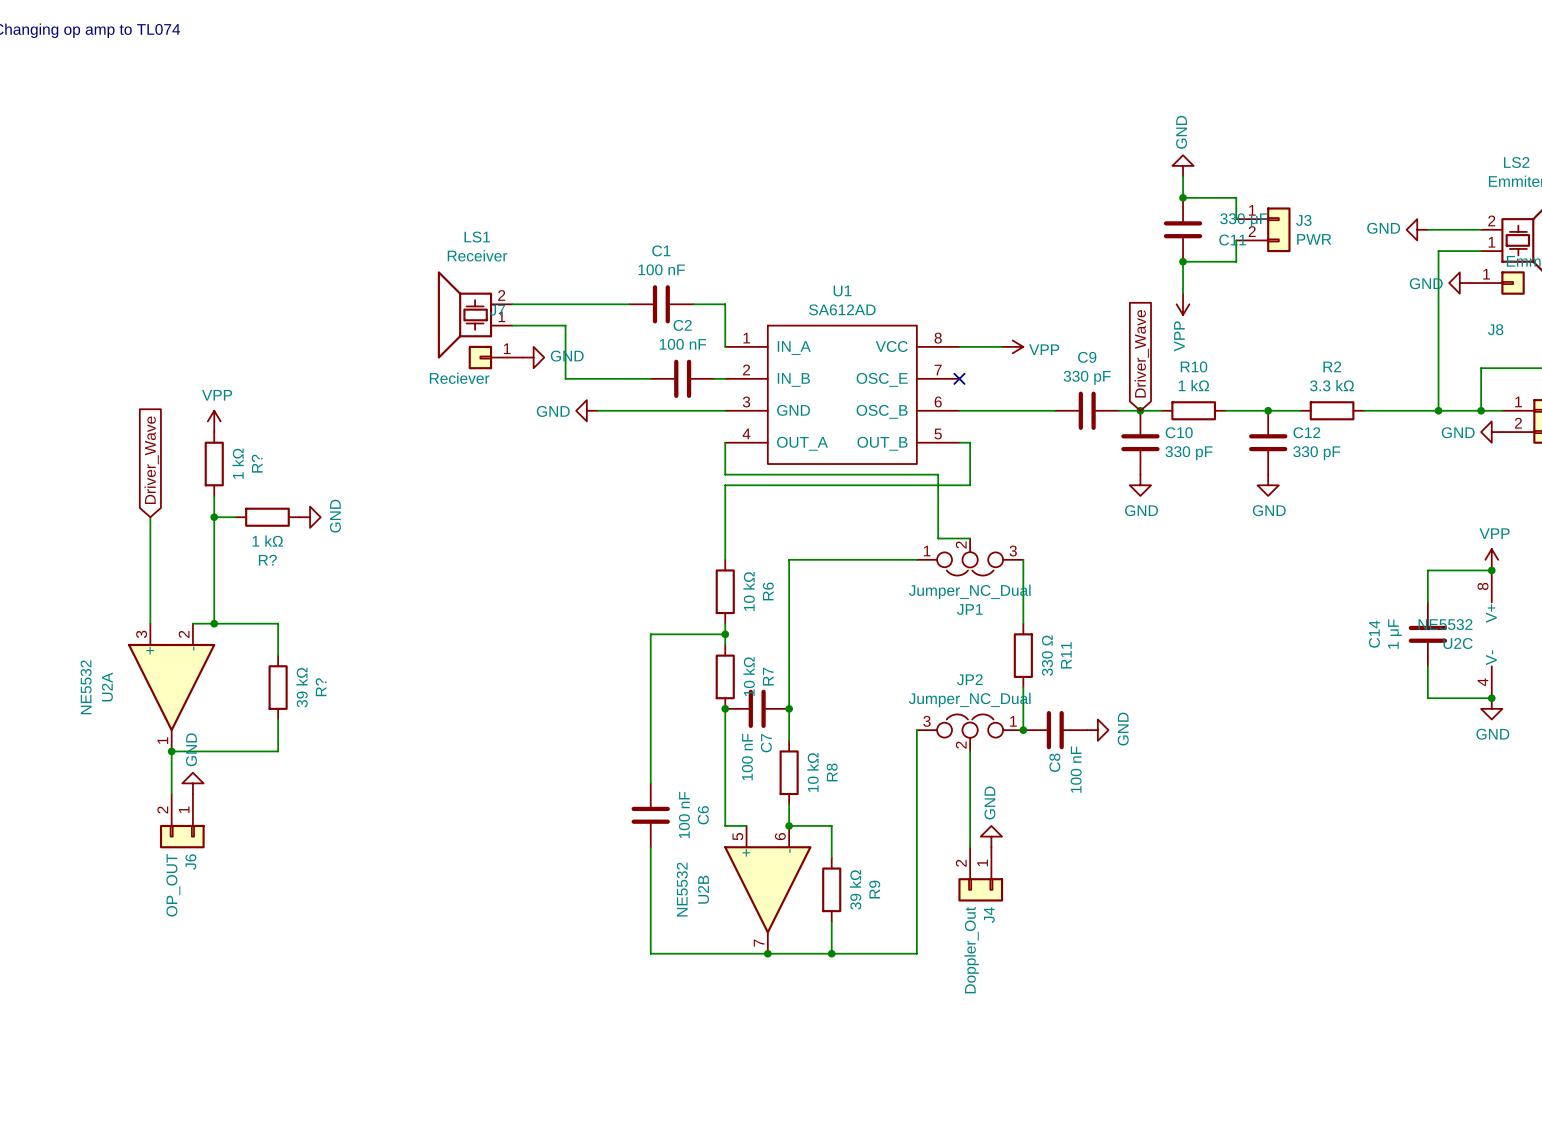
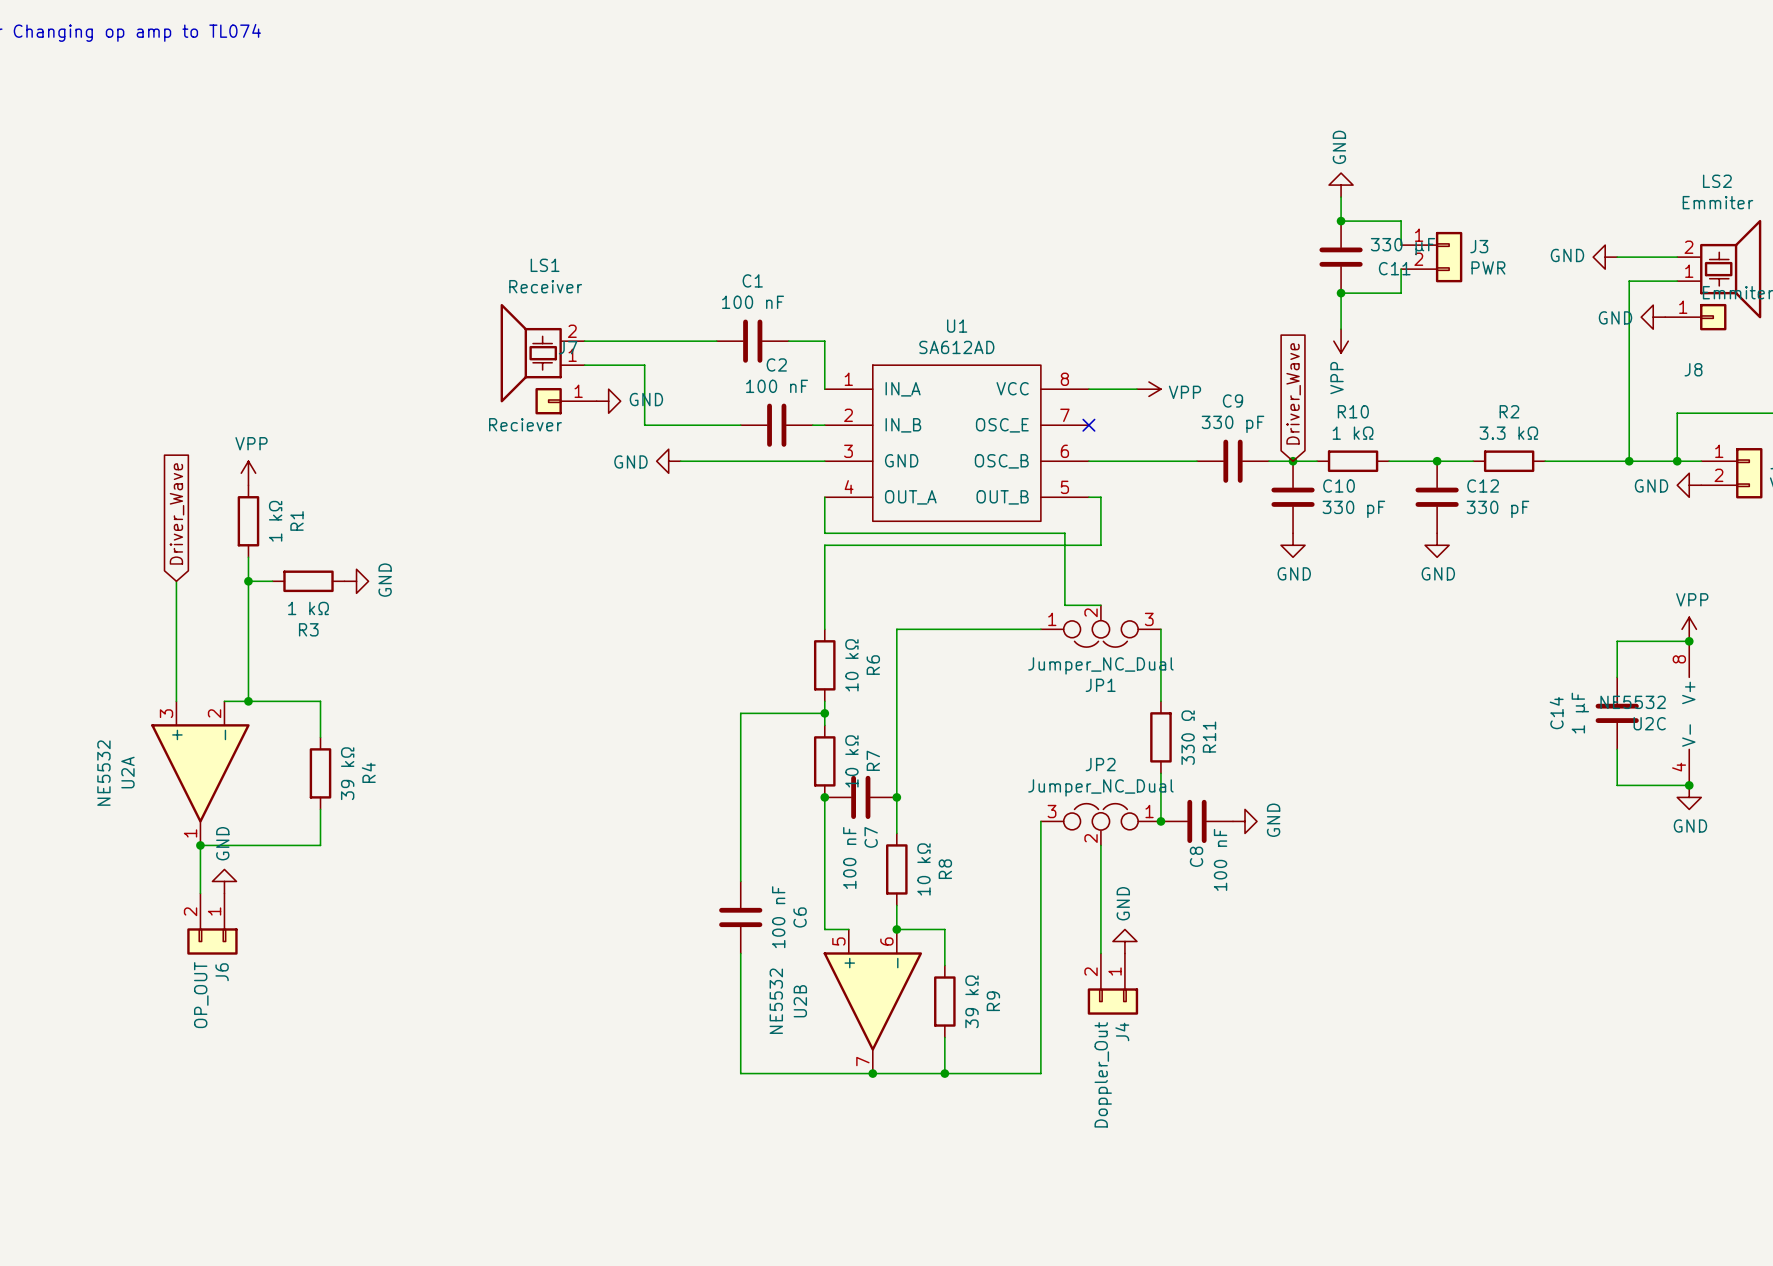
R? name: R? (257, 463) -> R1 (297, 520)
R? name: R? (267, 560) -> R3 (308, 629)
R? name: R? (321, 687) -> R4 (368, 772)

